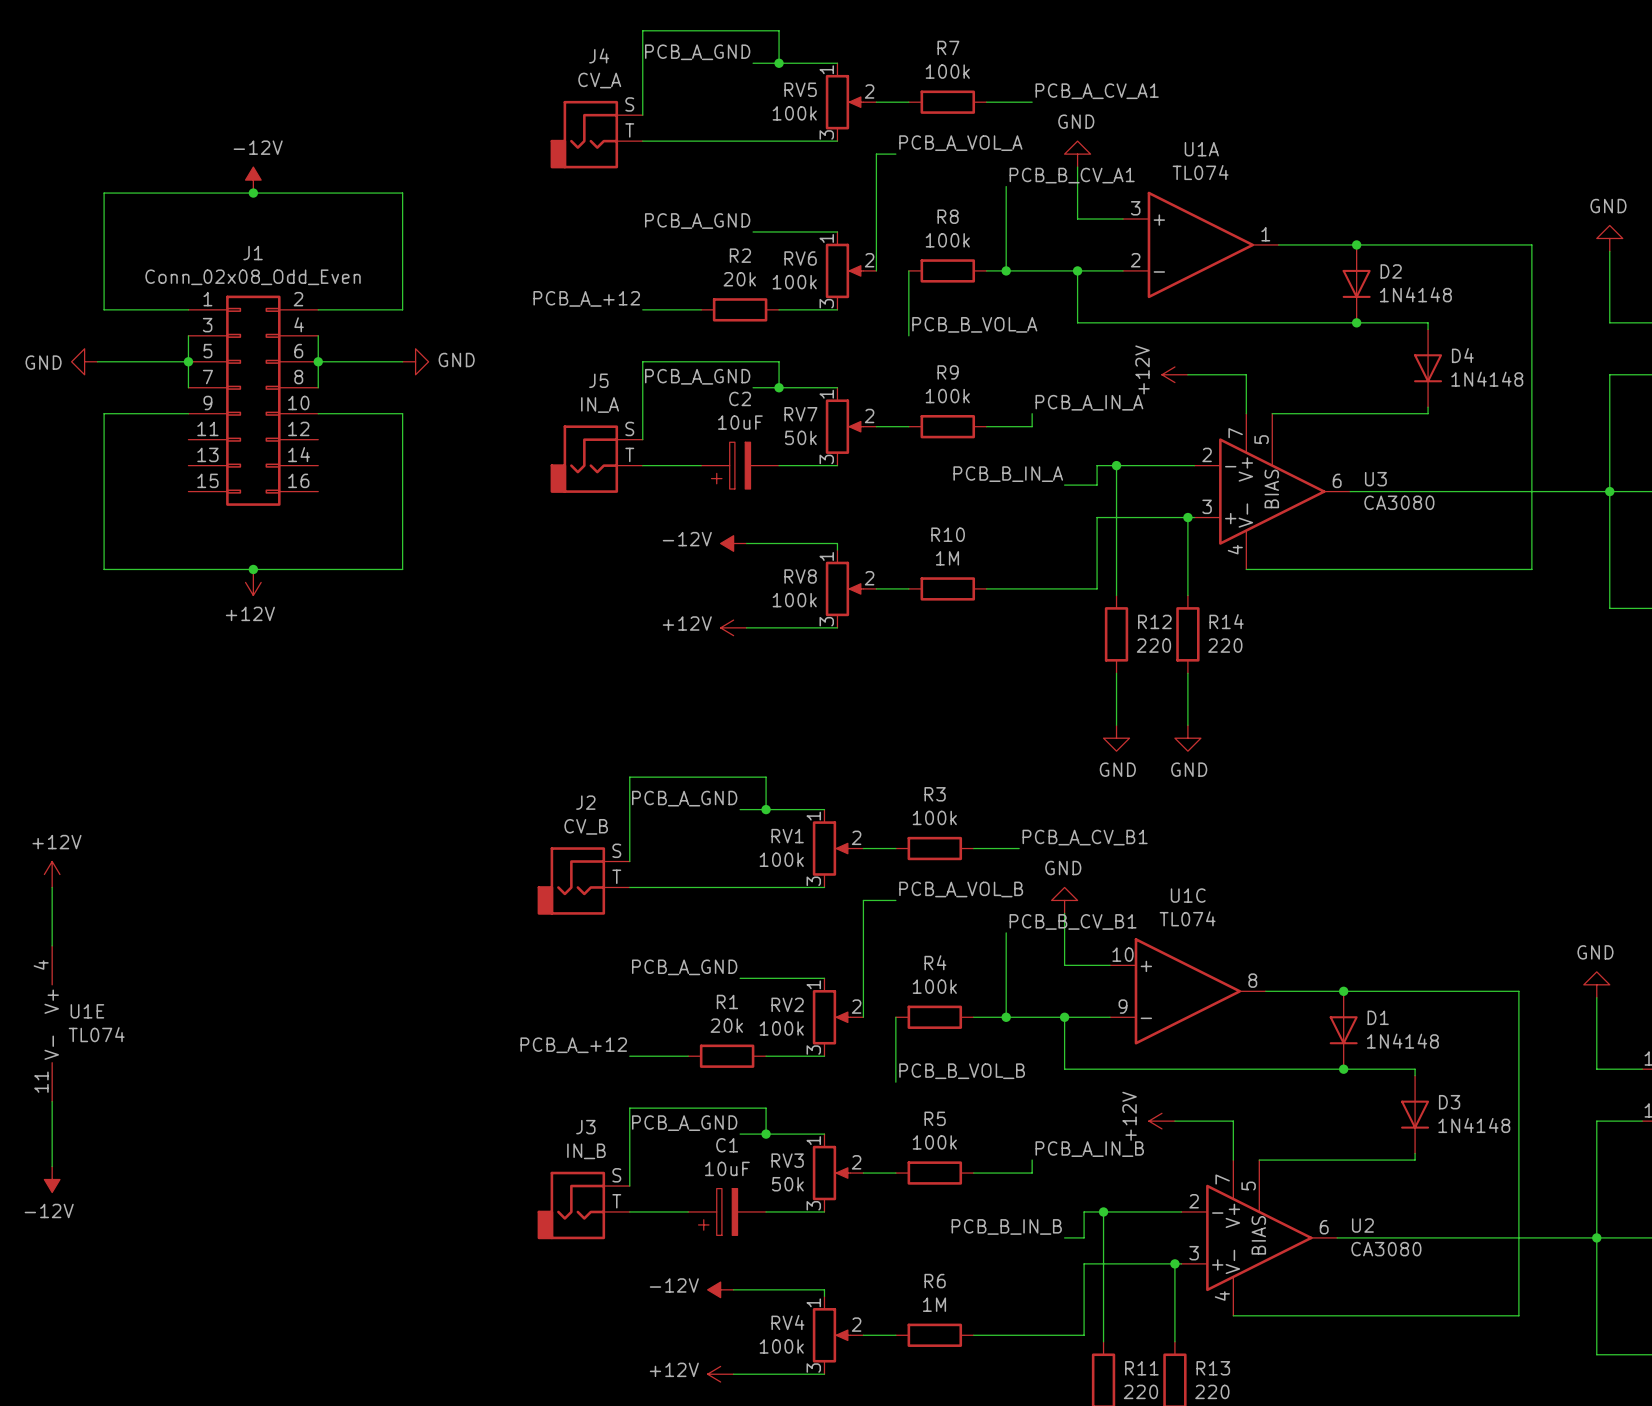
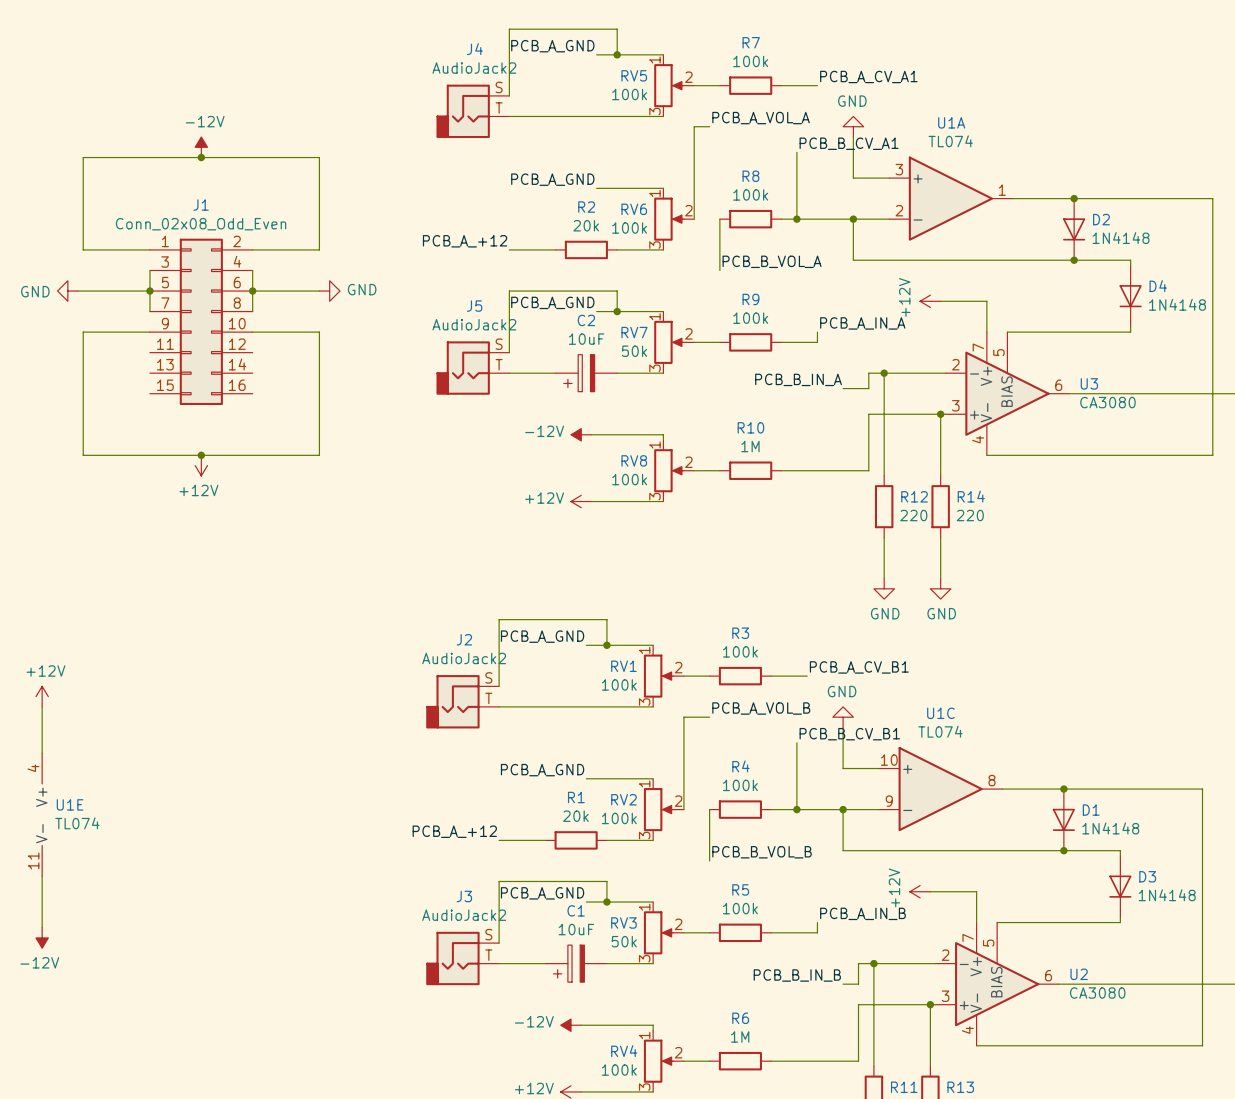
J4 value: CV_A (599, 80) -> AudioJack2 (474, 68)
J5 value: IN_A (600, 405) -> AudioJack2 (474, 324)
J2 value: CV_B (586, 826) -> AudioJack2 (464, 658)
J3 value: IN_B (586, 1151) -> AudioJack2 (464, 915)

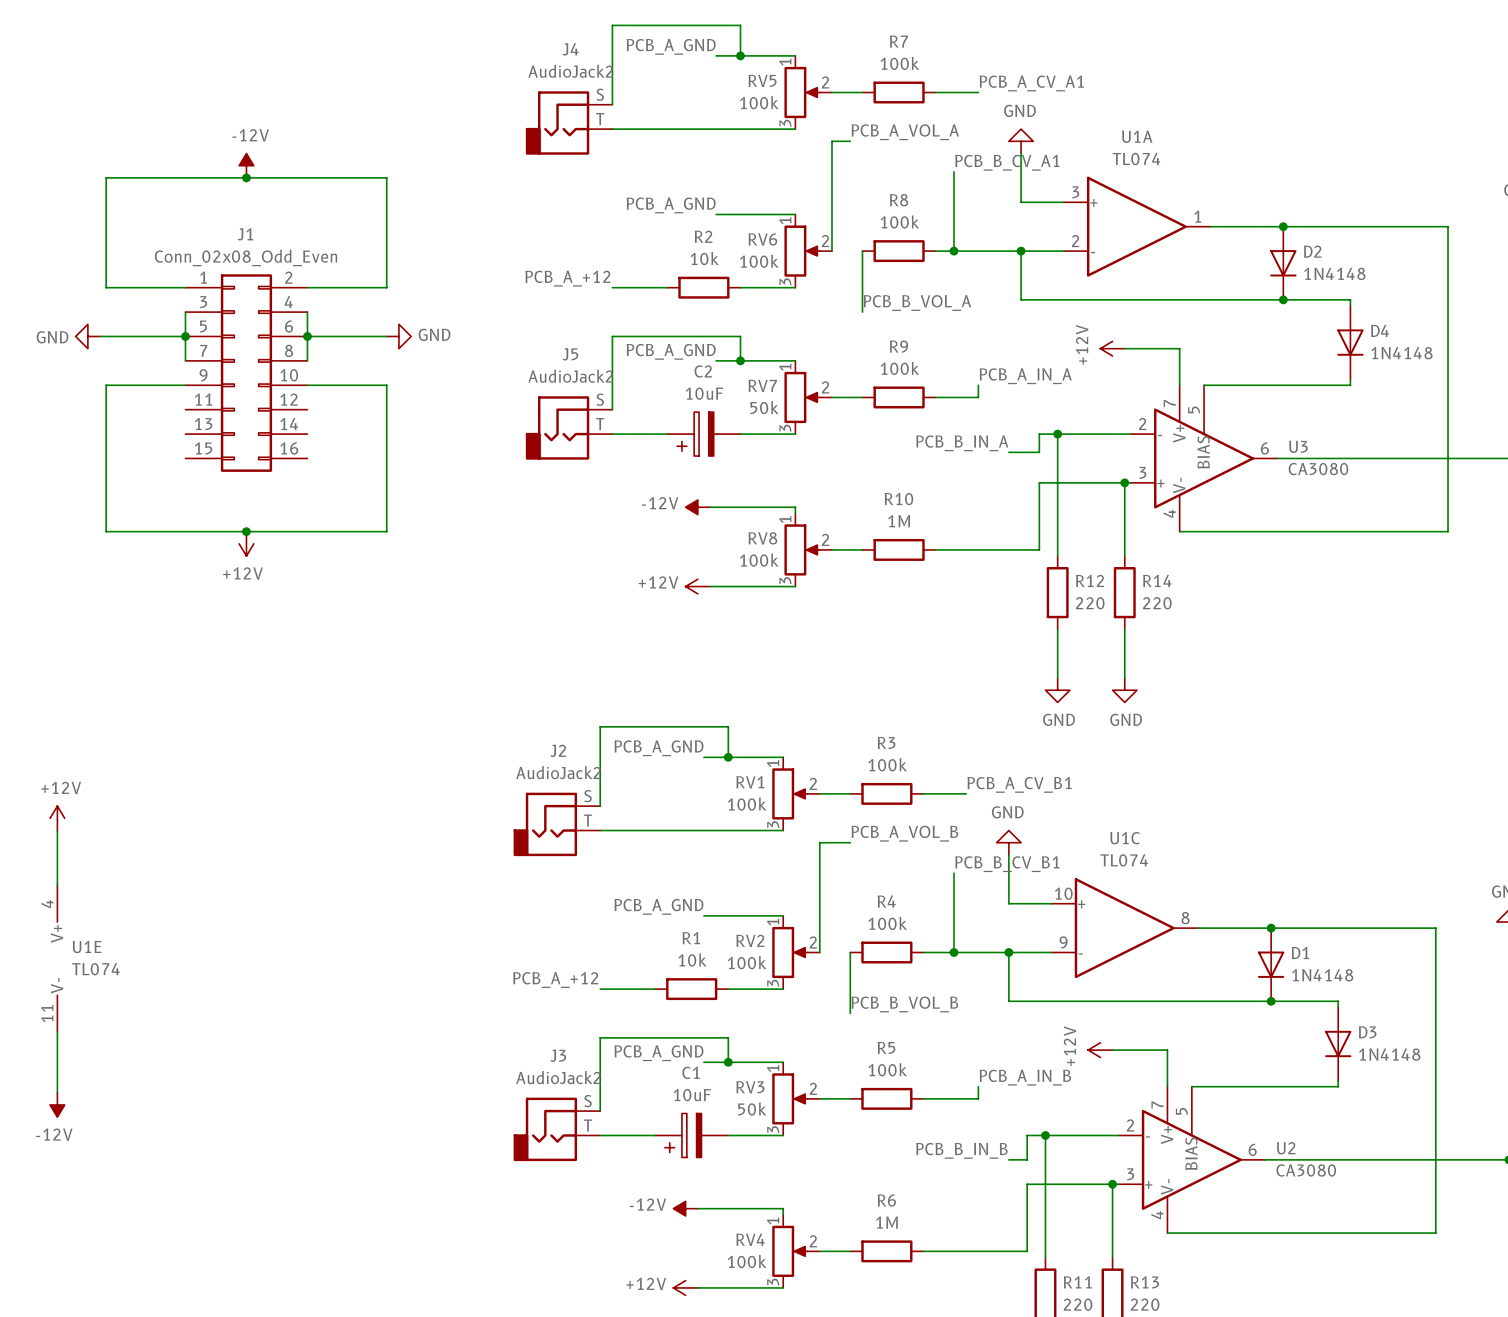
R2 value: 20k (586, 225) -> 10k (704, 258)
R1 value: 20k (575, 816) -> 10k (692, 960)

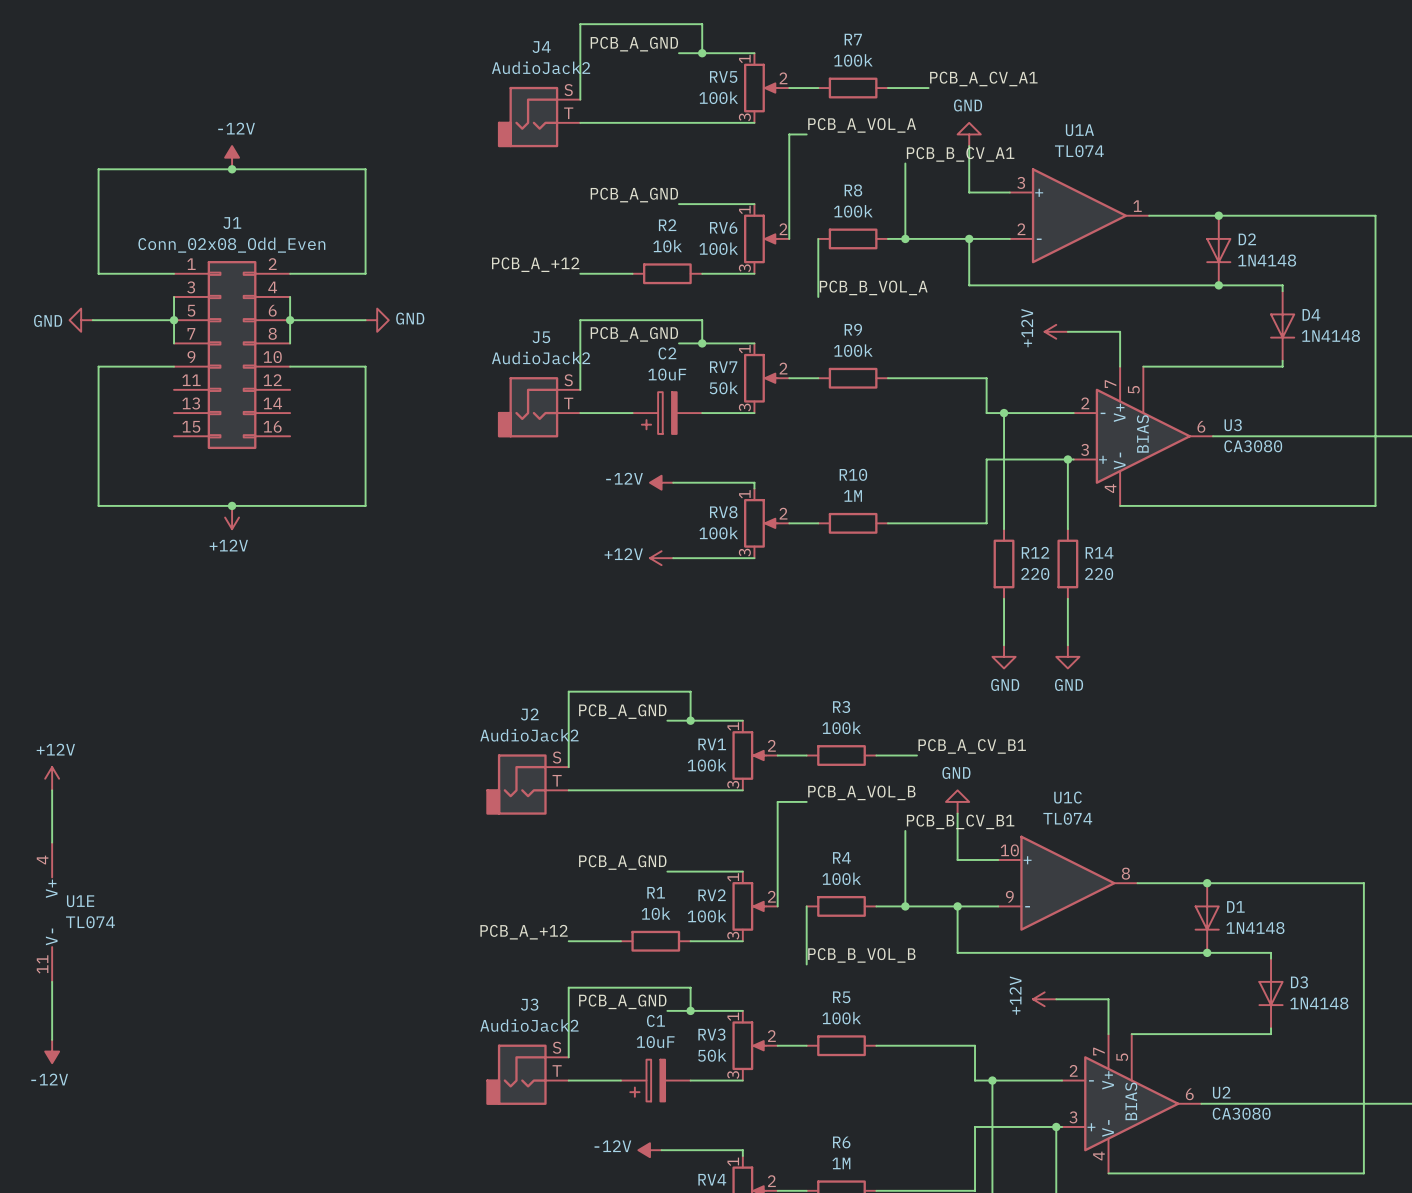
label: PCB_A_IN_A (1025, 376) -> none
wire: (978, 385) (978, 397) -> none
wire: (1039, 434) (1039, 452) (1008, 452) -> (986, 413) (986, 378) (928, 378)
label: PCB_B_IN_A (962, 443) -> none
label: PCB_A_IN_B (1025, 1077) -> none
wire: (978, 1086) (978, 1098) -> none
wire: (1027, 1135) (1027, 1159) (1008, 1159) -> (975, 1080) (975, 1045) (928, 1045)
label: PCB_B_IN_B (961, 1150) -> none

